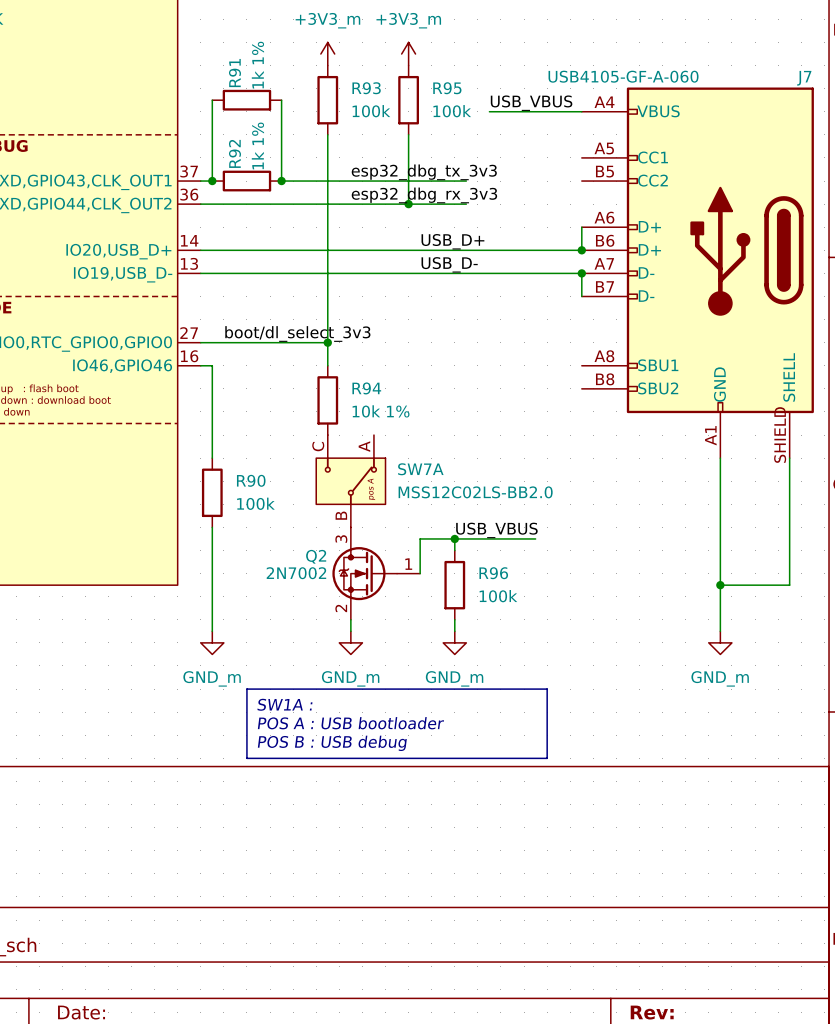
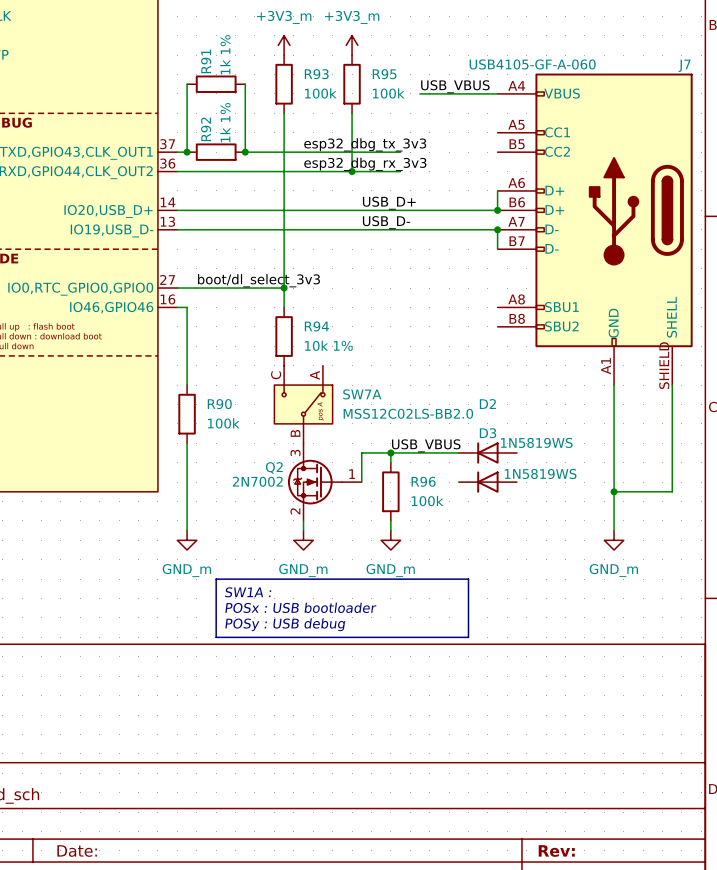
D2: none -> 1N5819WS (487, 452)
D3: none -> 1N5819WS (487, 482)
text: POS A : USB bootloader (350, 723) -> POSx : USB bootloader (300, 607)
text: POS B : USB debug (332, 743) -> POSy : USB debug (285, 624)

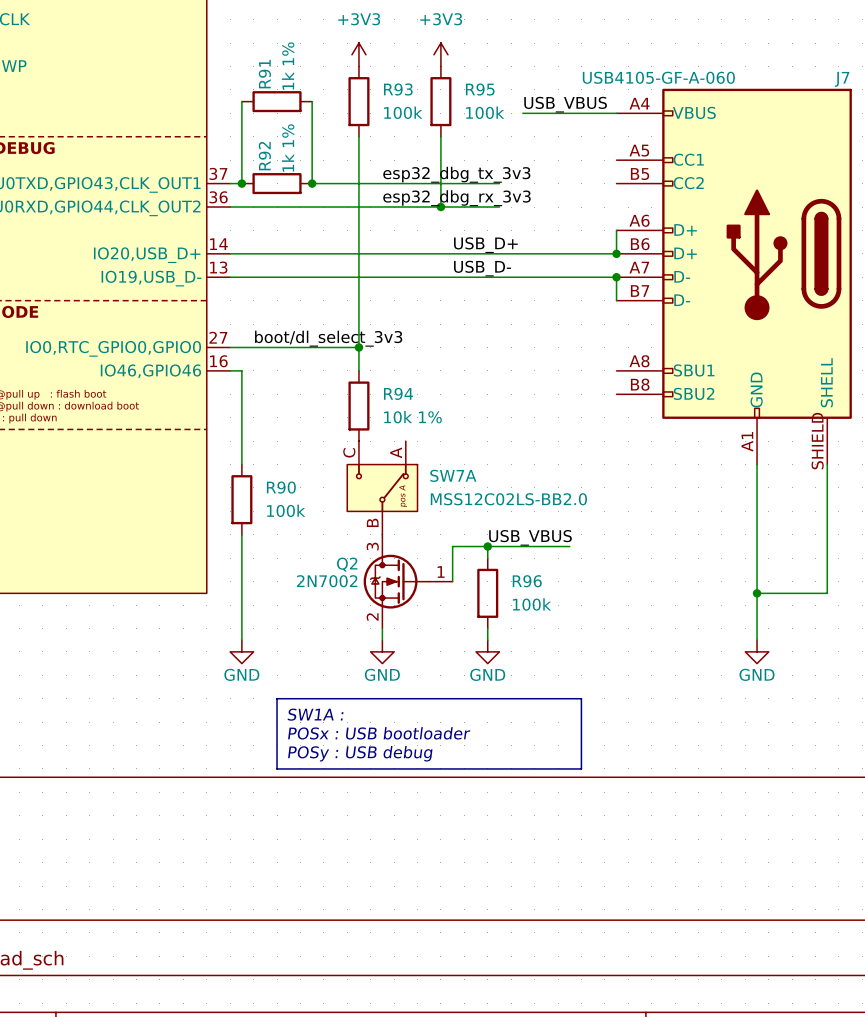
power symbol: +3V3_m (284, 45) -> +3V3 (358, 54)
power symbol: +3V3_m (352, 45) -> +3V3 (440, 54)
D2: 1N5819WS (487, 452) -> none
D3: 1N5819WS (487, 482) -> none
power symbol: GND_m (187, 540) -> GND (241, 651)
power symbol: GND_m (303, 540) -> GND (382, 651)
power symbol: GND_m (390, 540) -> GND (487, 651)
power symbol: GND_m (614, 540) -> GND (757, 651)

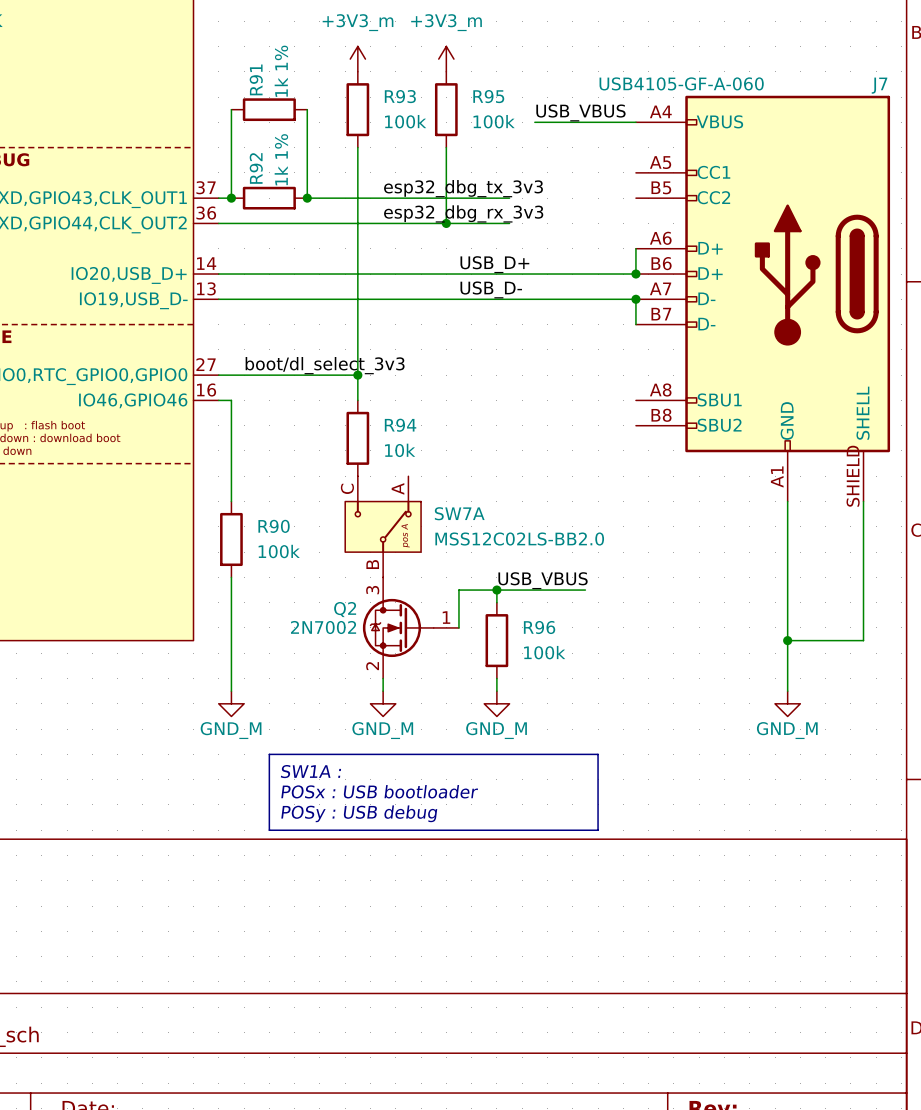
power symbol: +3V3 (358, 54) -> +3V3_m (357, 59)
power symbol: +3V3 (440, 54) -> +3V3_m (446, 59)
R94 value: 10k 1% (412, 417) -> 10k (400, 450)
power symbol: GND (241, 651) -> GND_M (231, 703)
power symbol: GND (382, 651) -> GND_M (383, 703)
power symbol: GND (487, 651) -> GND_M (496, 703)
power symbol: GND (757, 651) -> GND_M (787, 703)

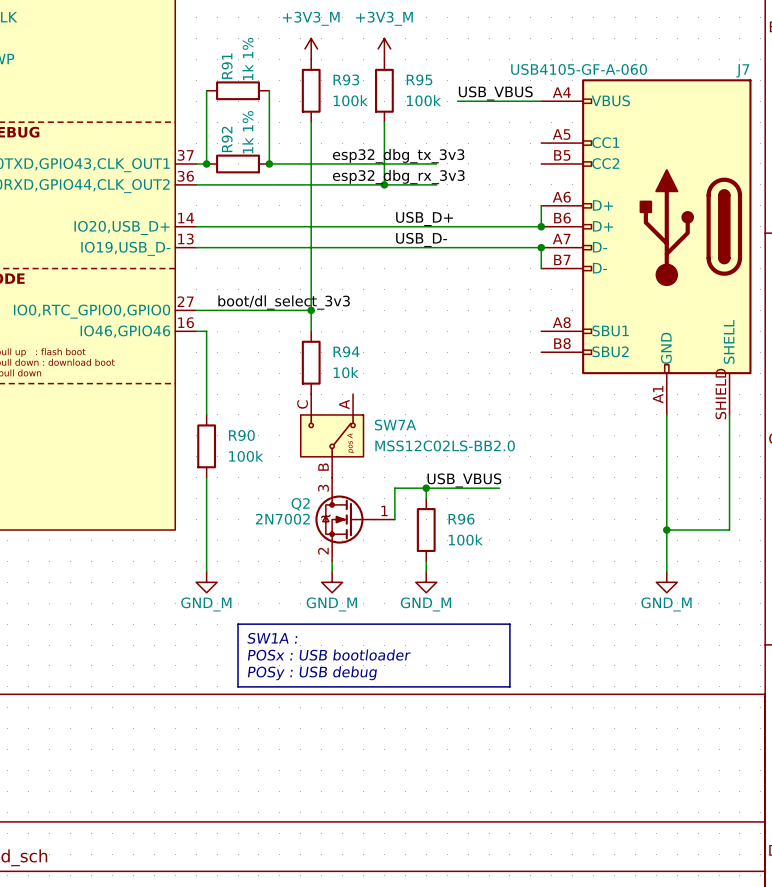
power symbol: +3V3_m (357, 59) -> +3V3_M (311, 48)
power symbol: +3V3_m (446, 59) -> +3V3_M (384, 48)

